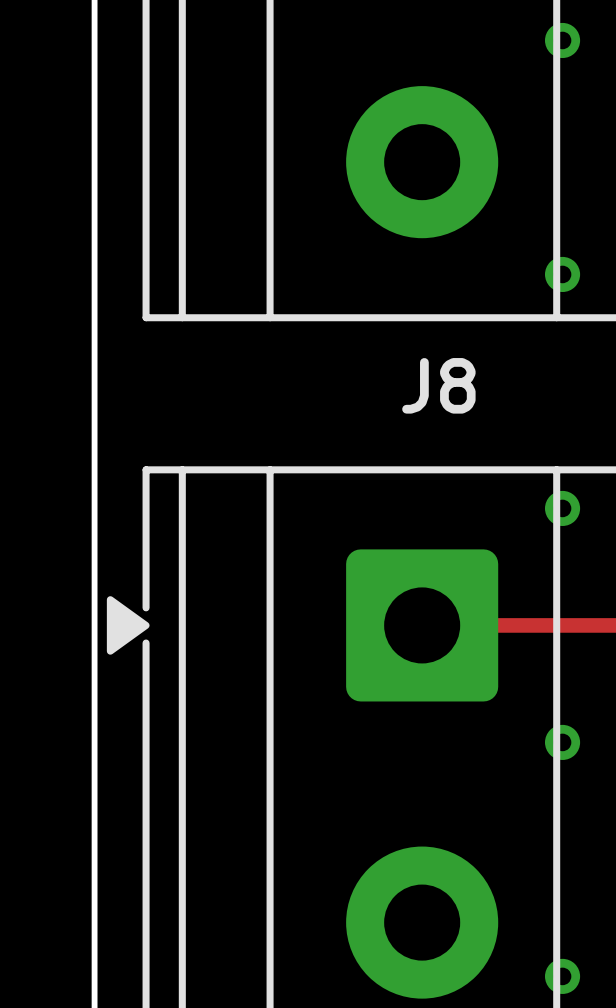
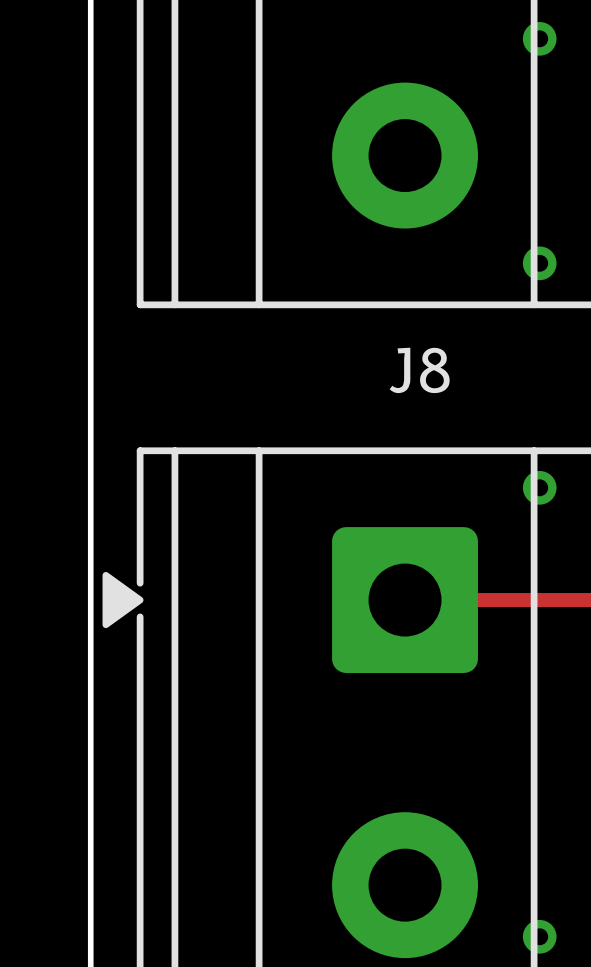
via: (562, 742) -> none

